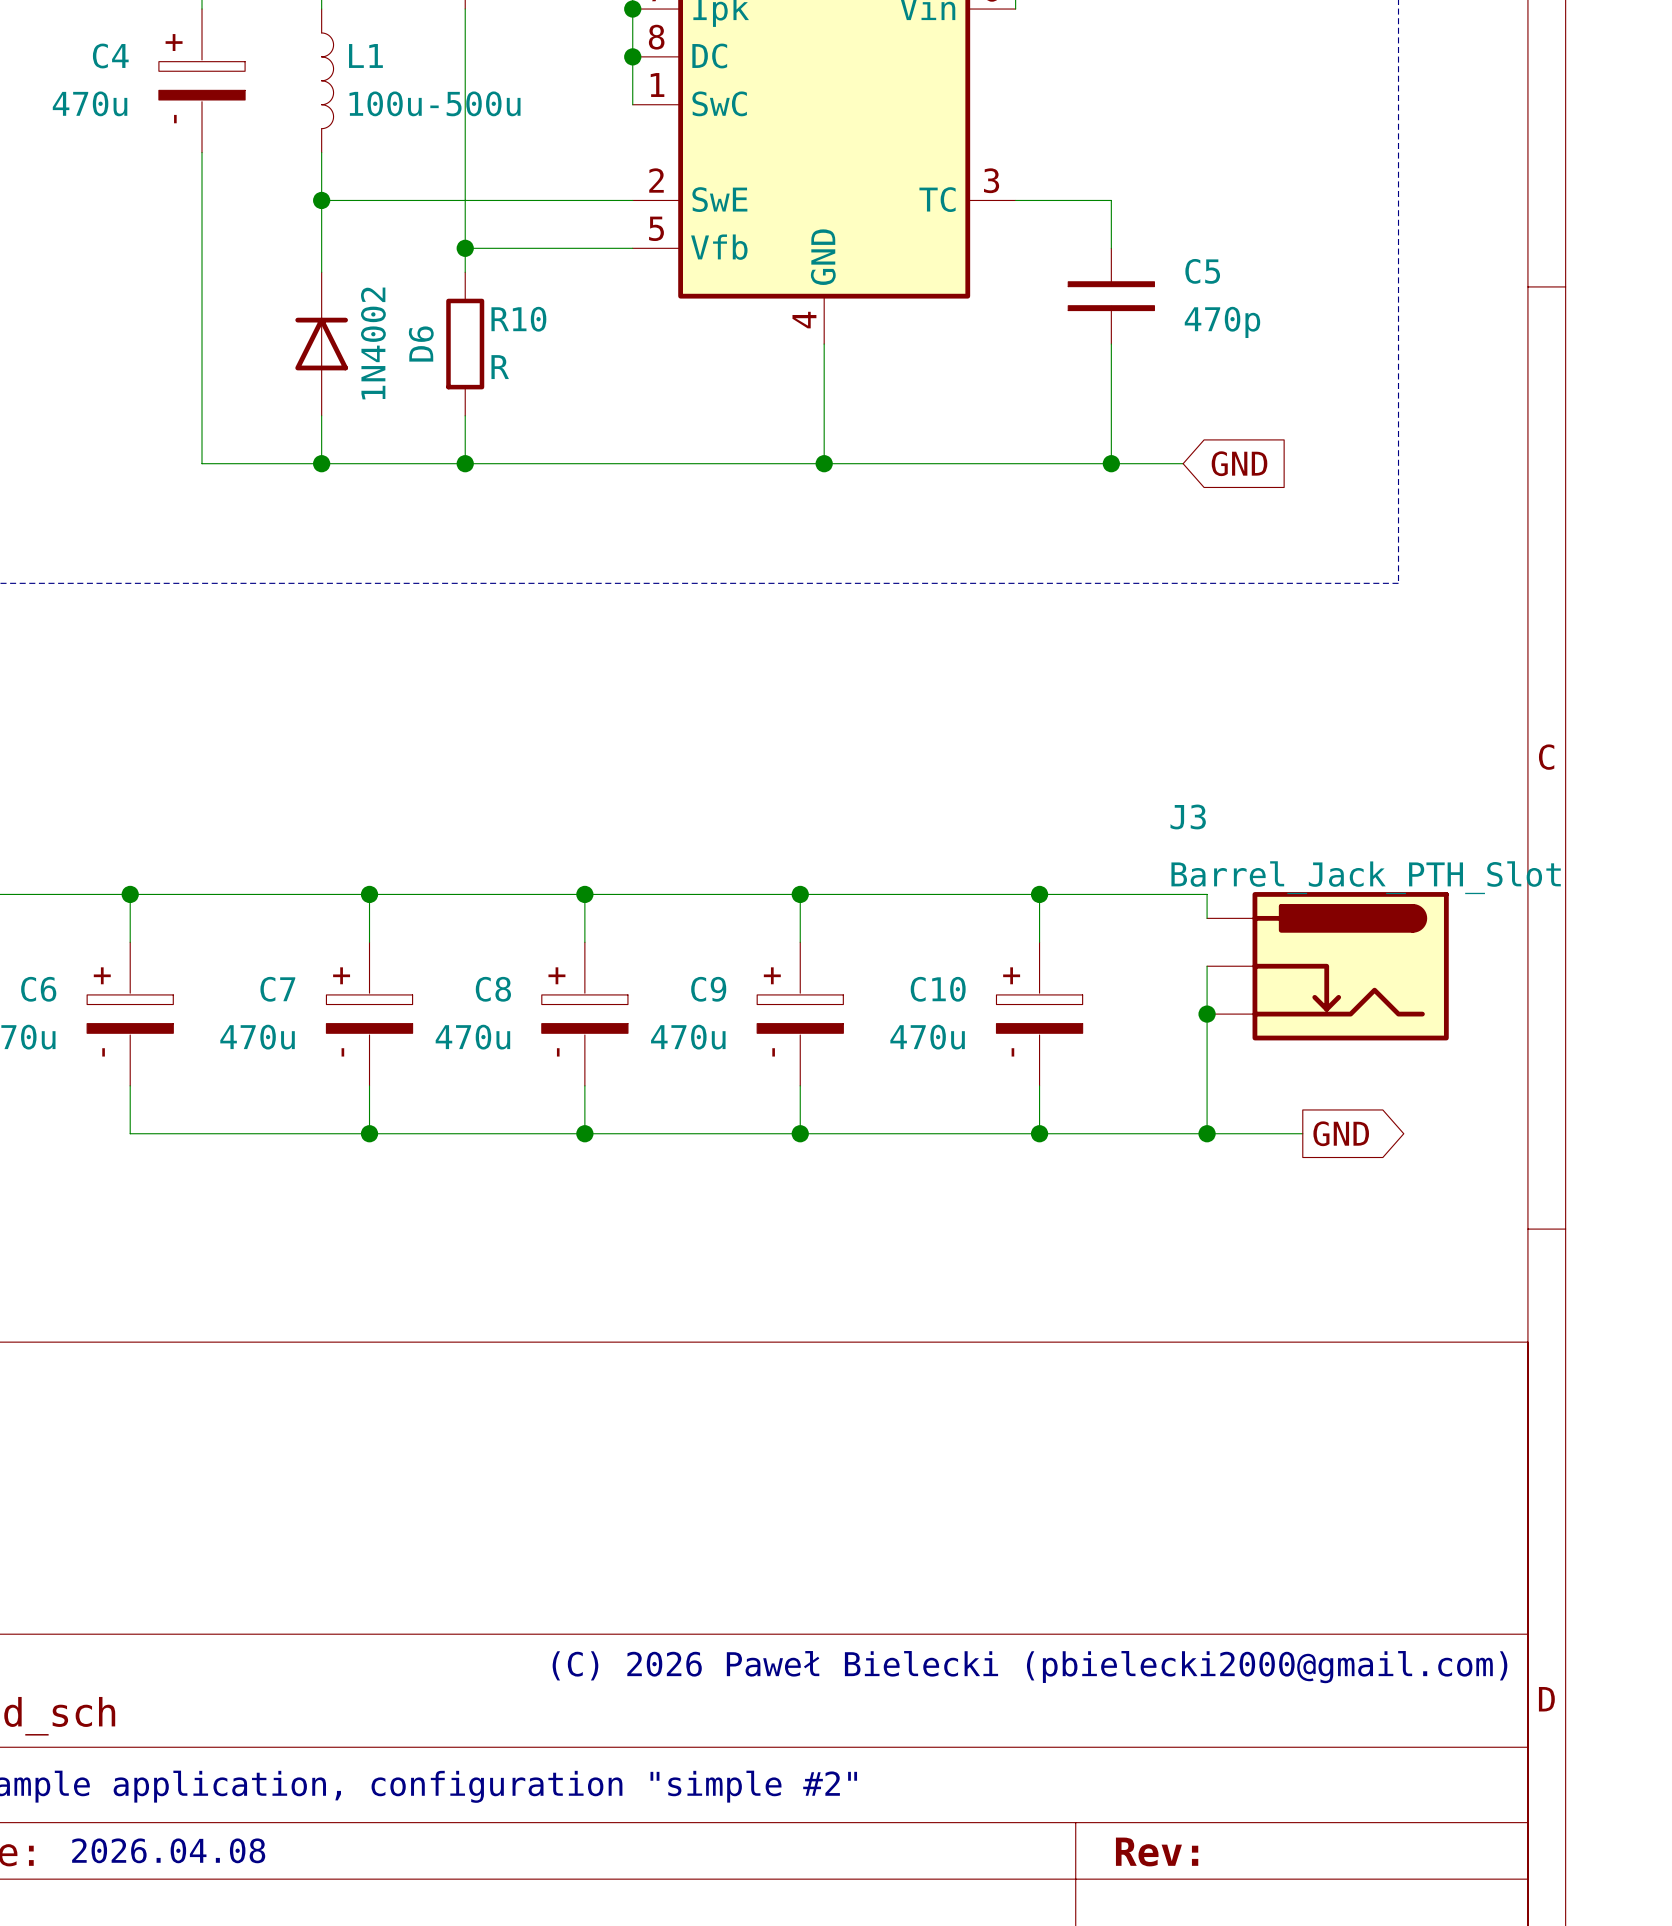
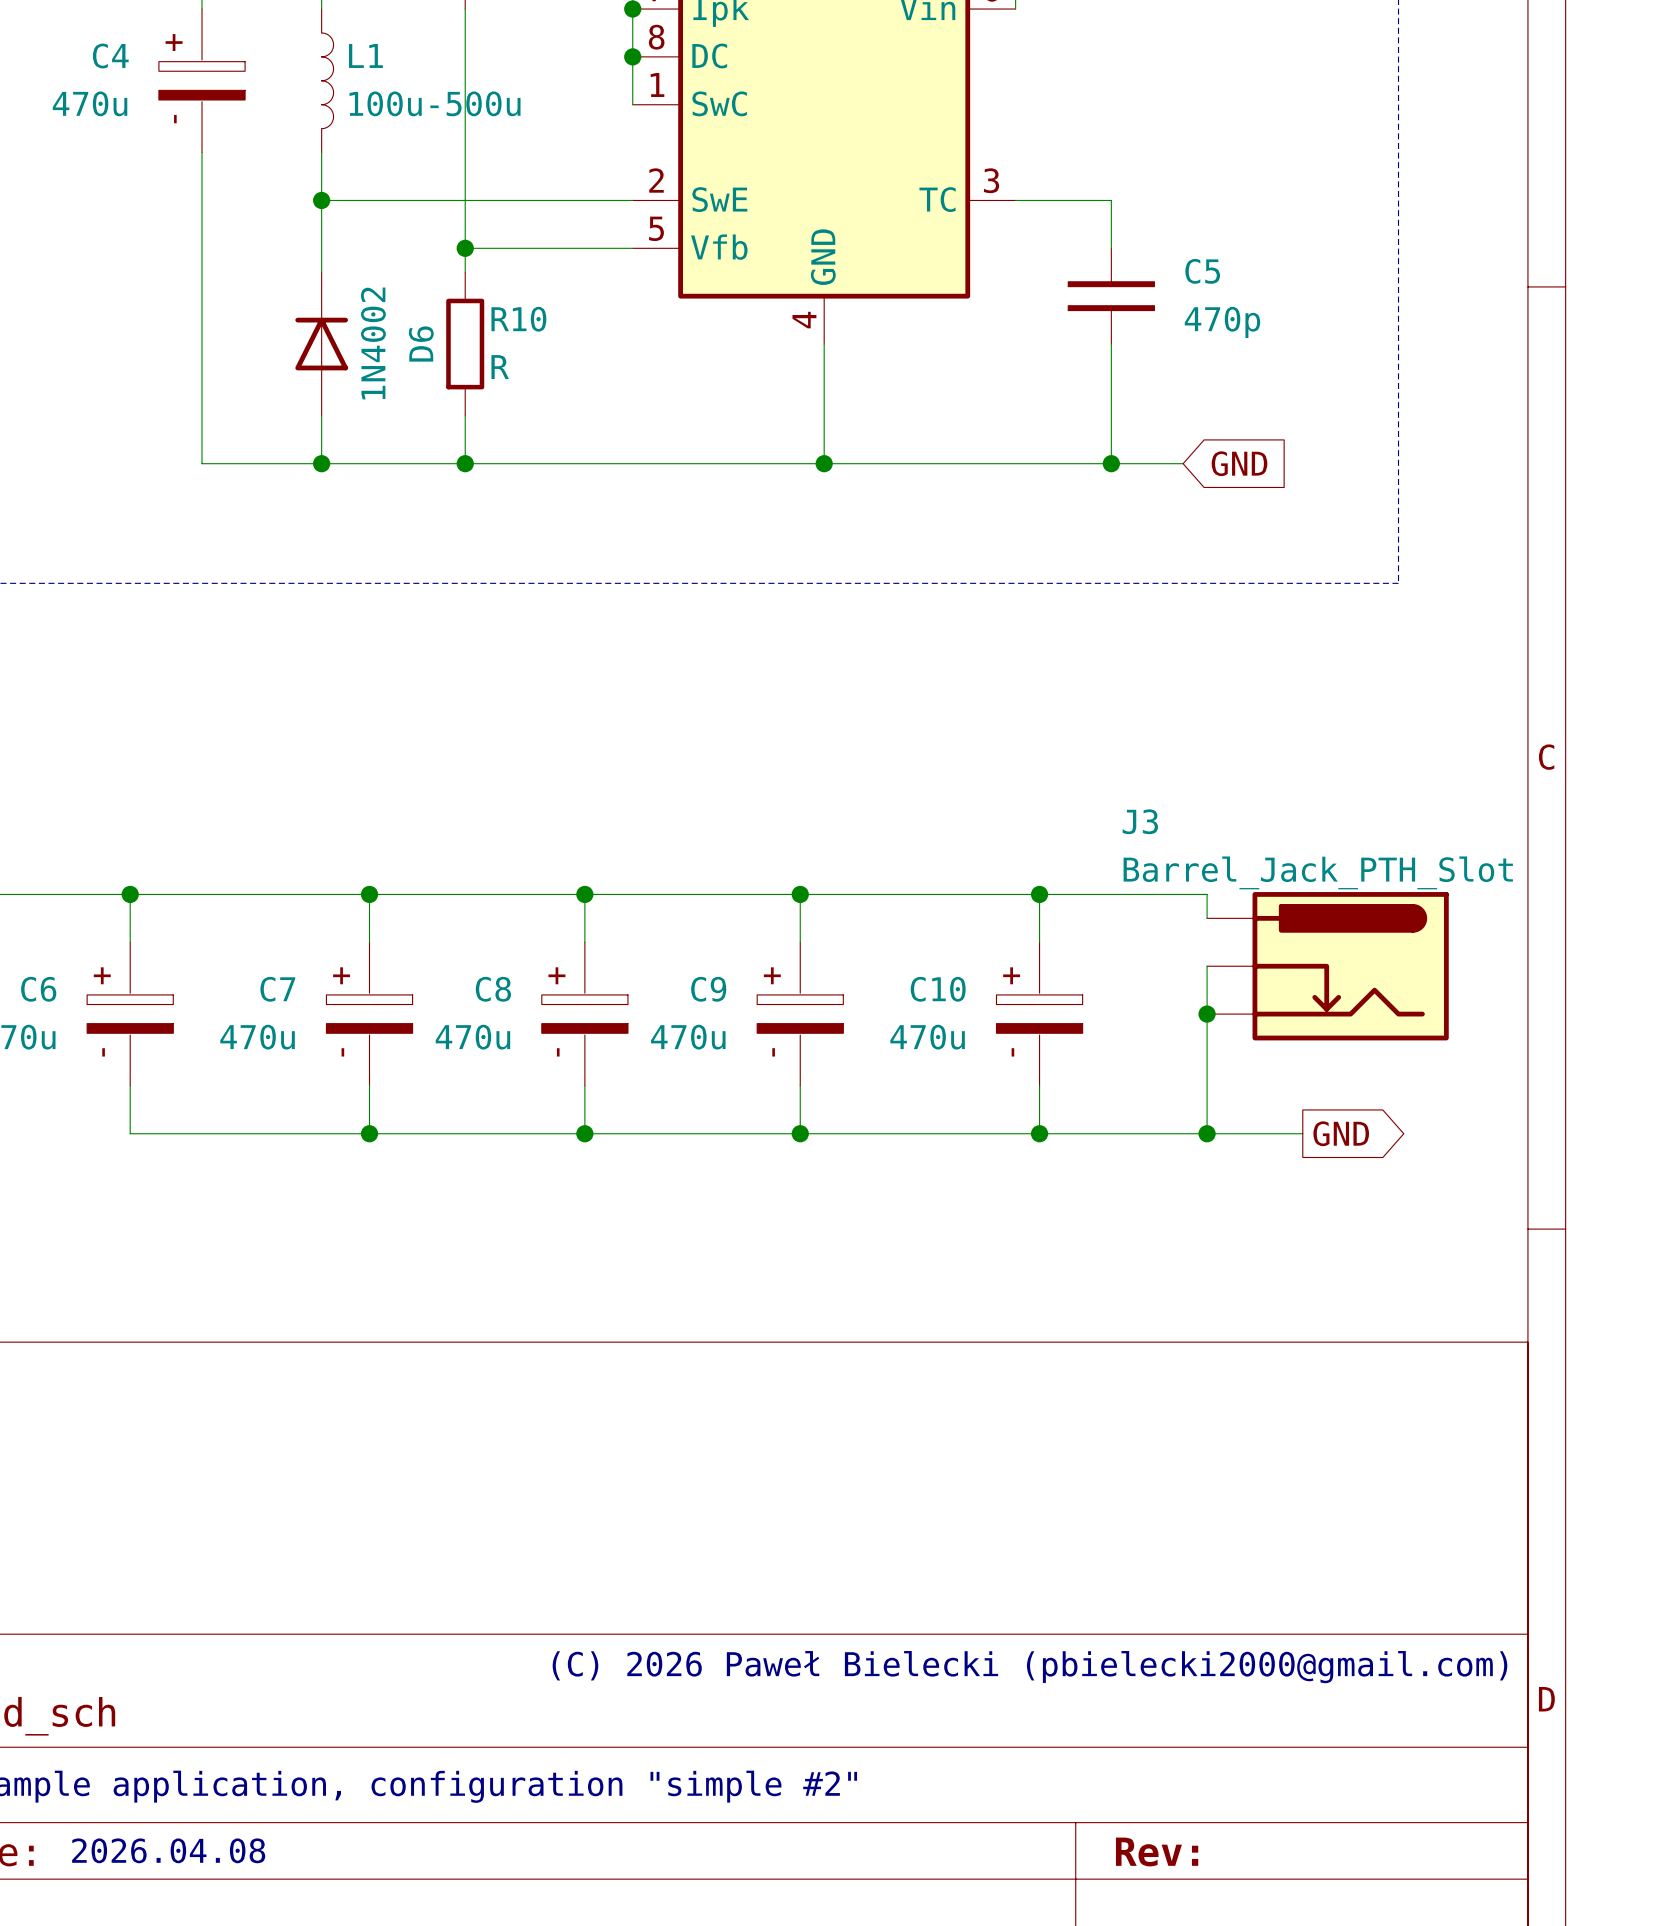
J3 name position: J3 (1188, 816) -> J3 (1140, 821)
J3 value position: Barrel_Jack_PTH_Slot (1366, 877) -> Barrel_Jack_PTH_Slot (1318, 872)

